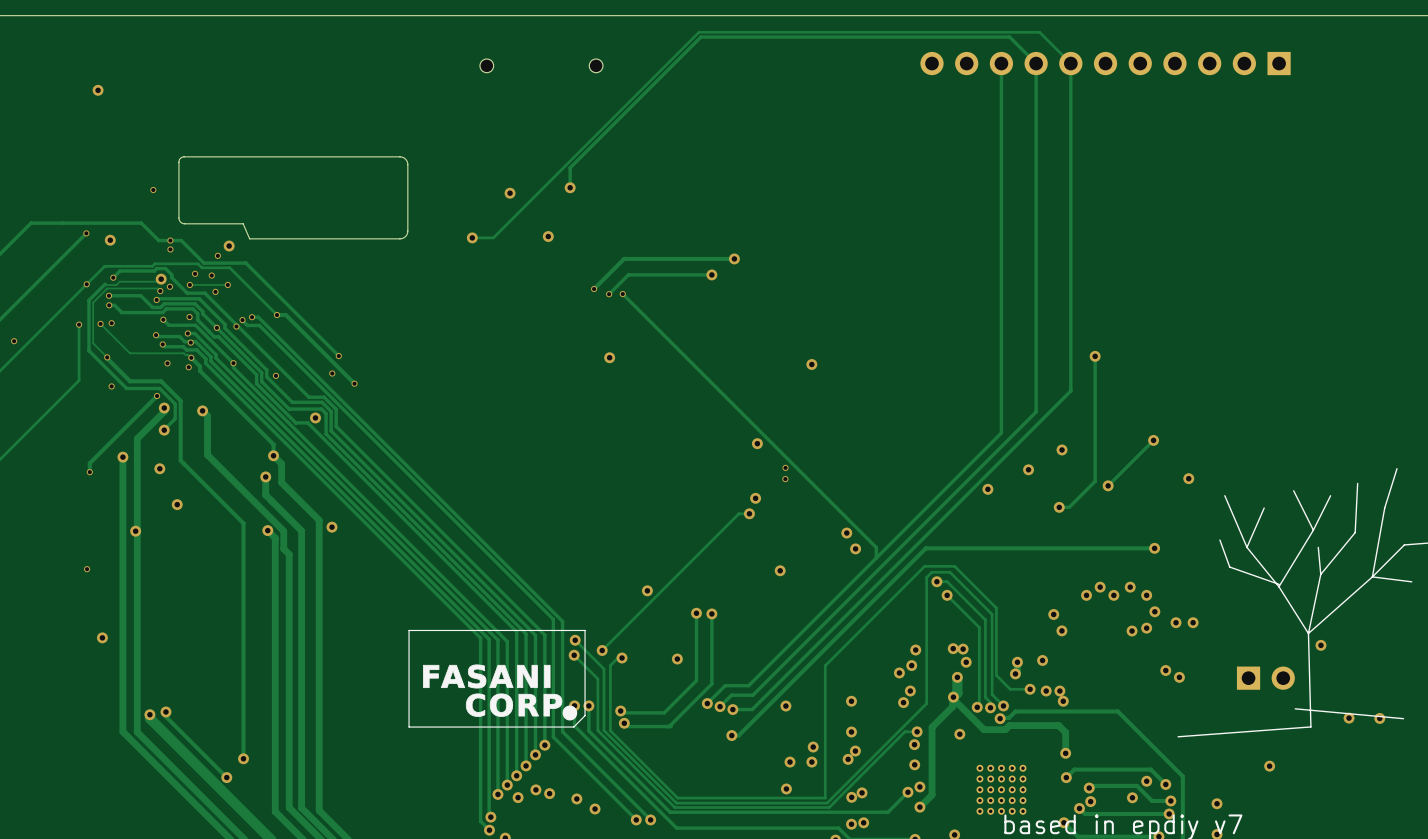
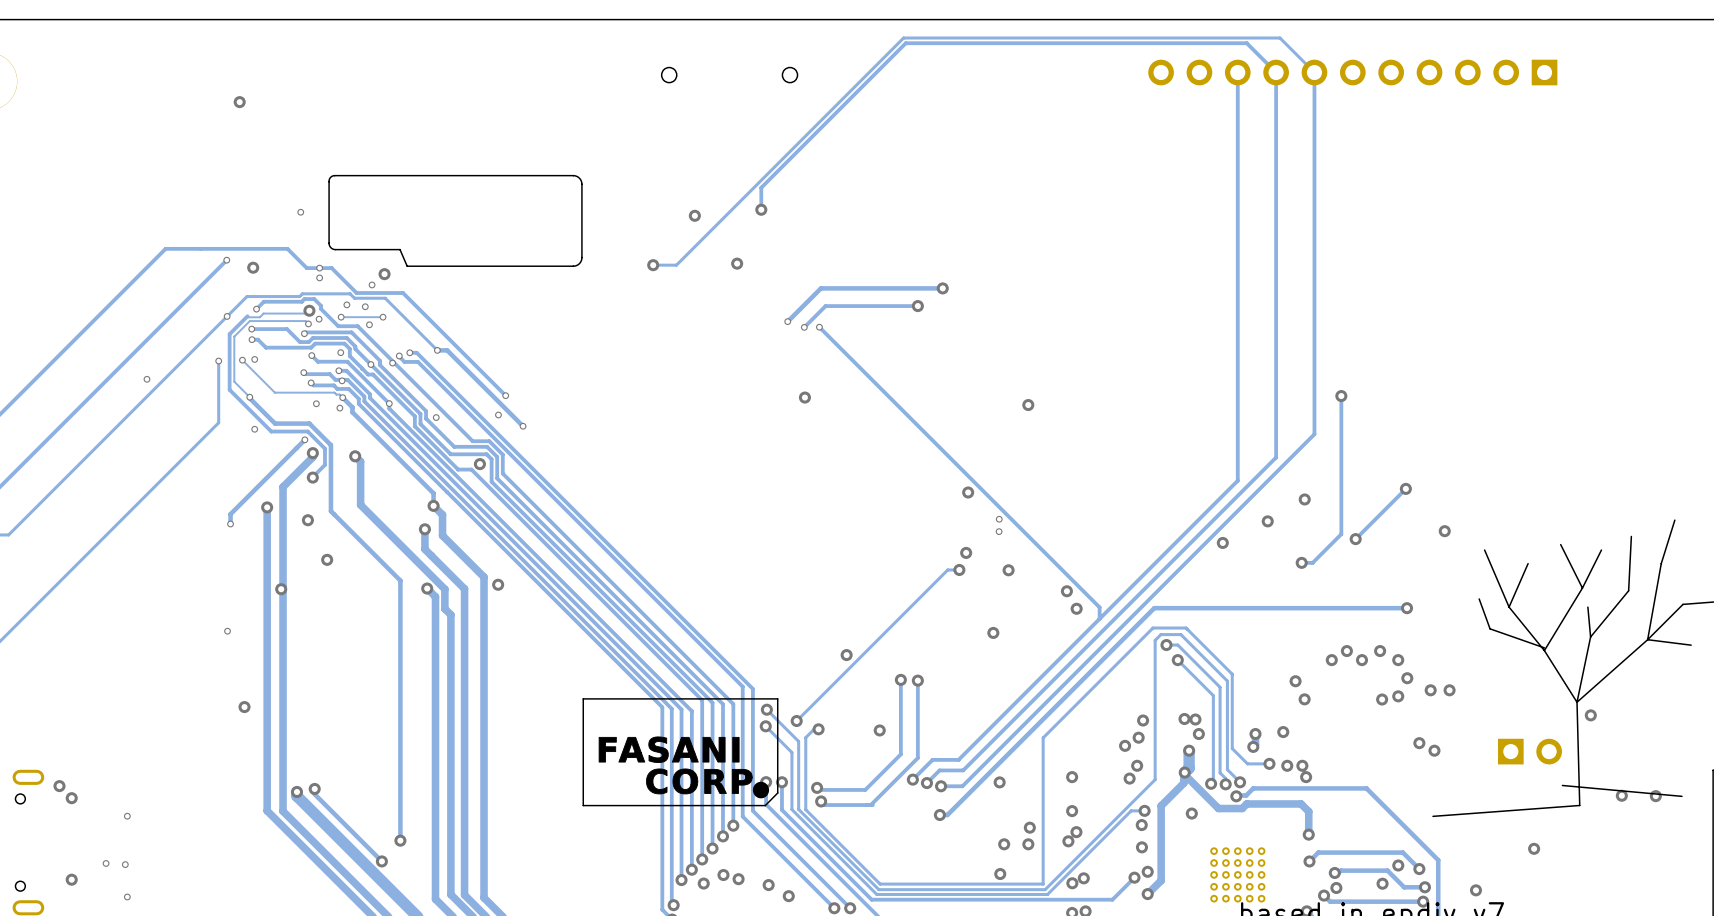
via: none -> (1008, 570)

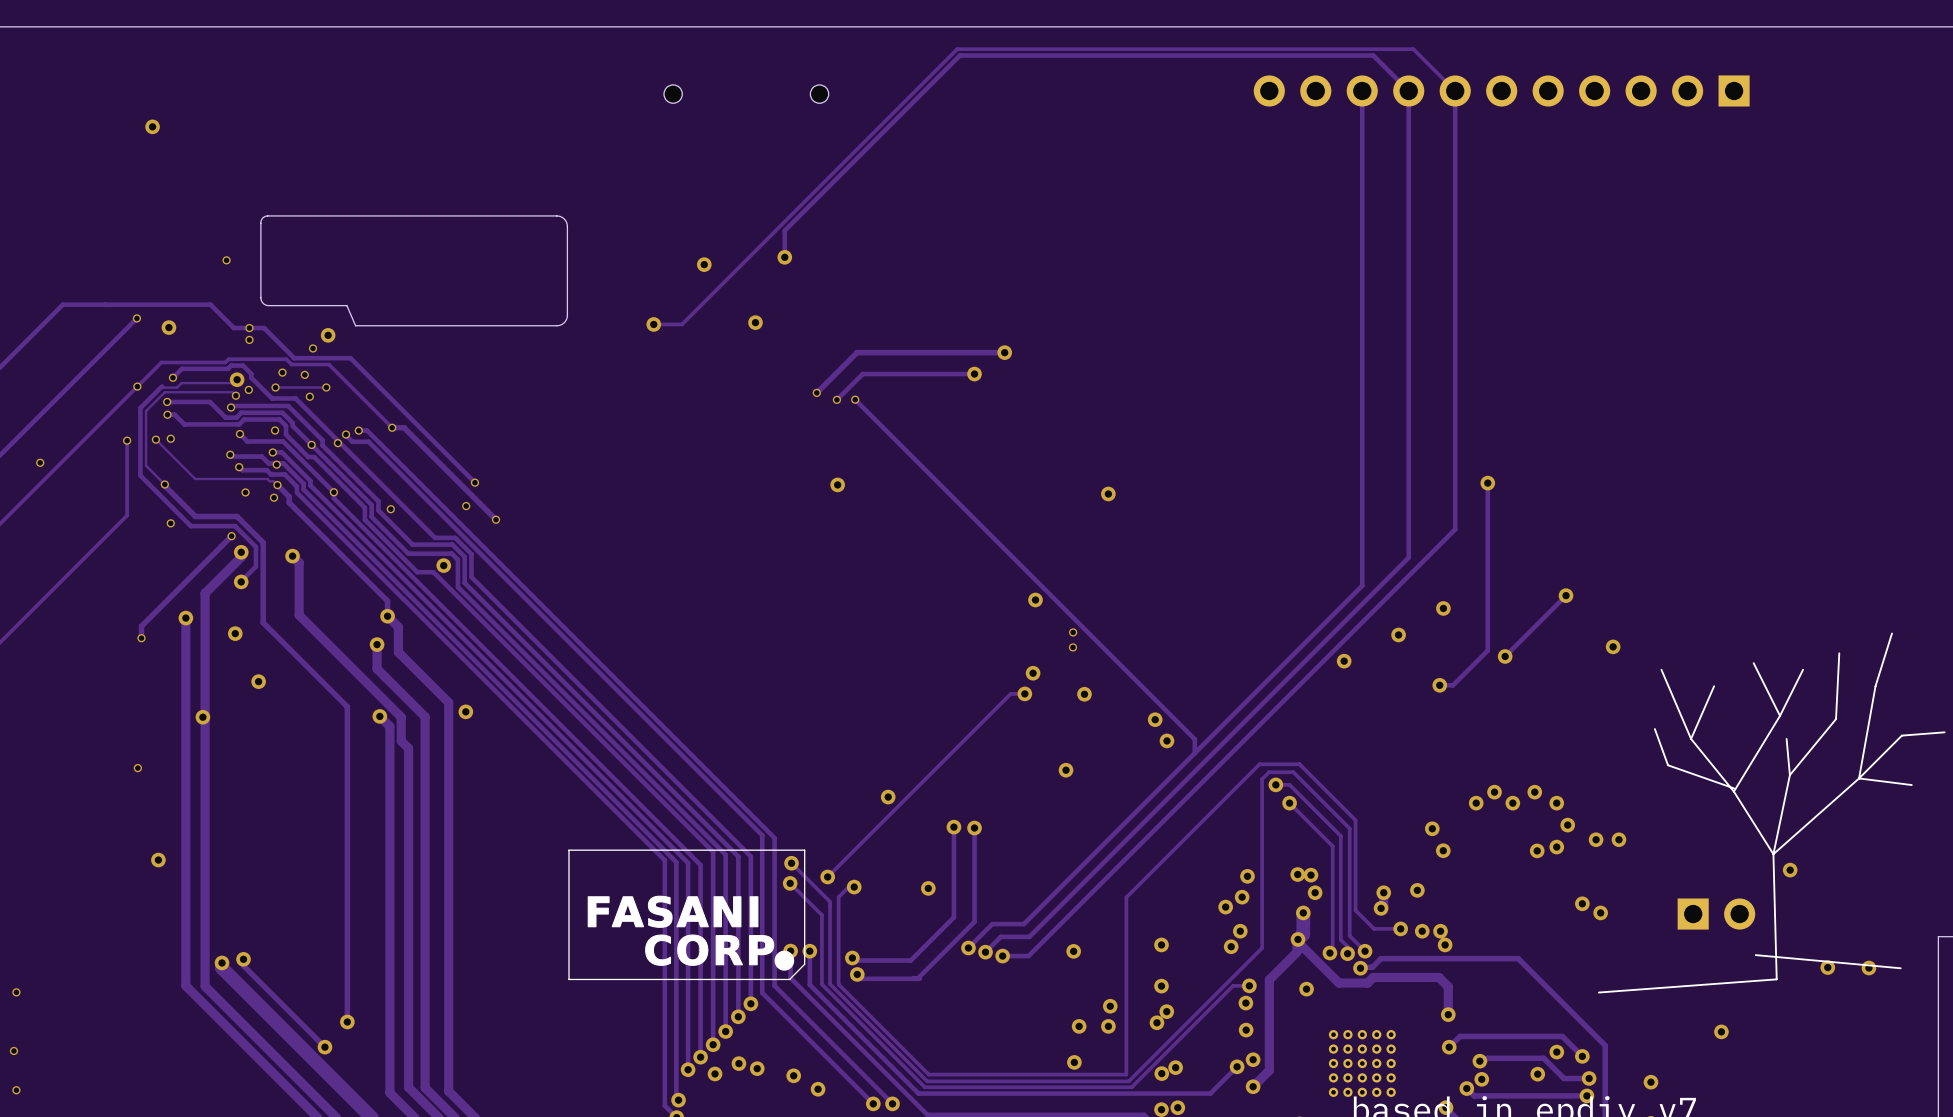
track: (1407, 608) (1154, 608) (947, 815) (939, 815) -> none
via: (1407, 608) -> none
via: (939, 815) -> none

